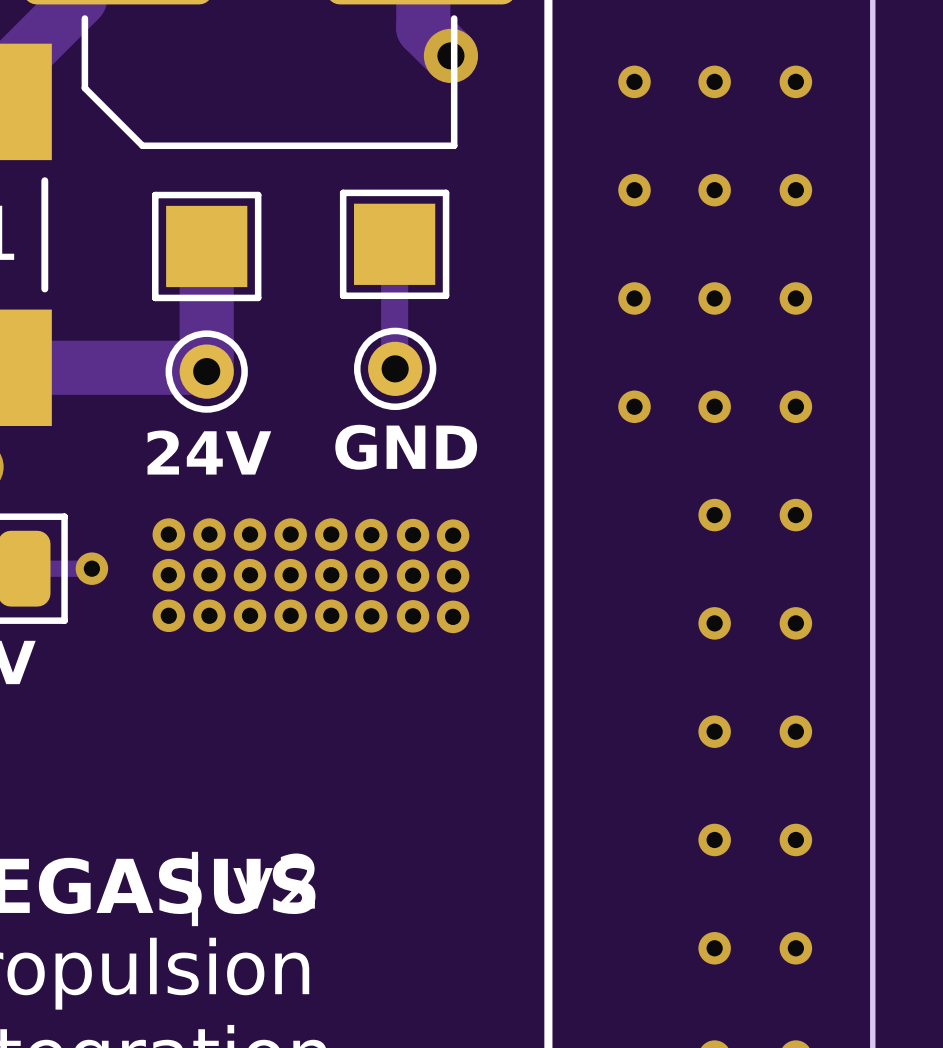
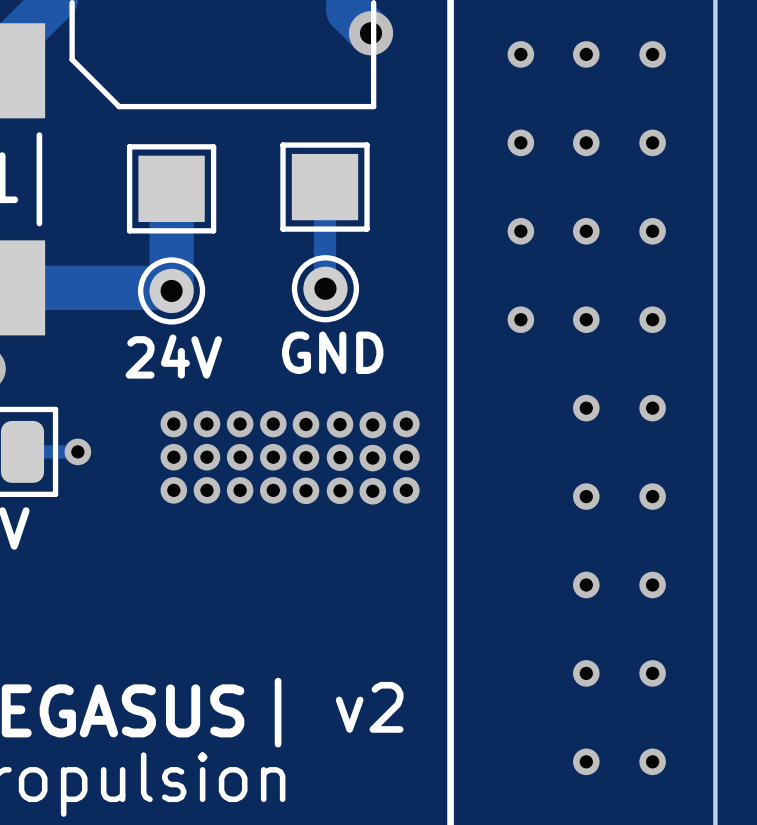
via: (168, 534) -> none
via: none -> (406, 424)
via: (168, 575) -> none
via: none -> (406, 457)
via: (168, 615) -> none
via: none -> (406, 490)

